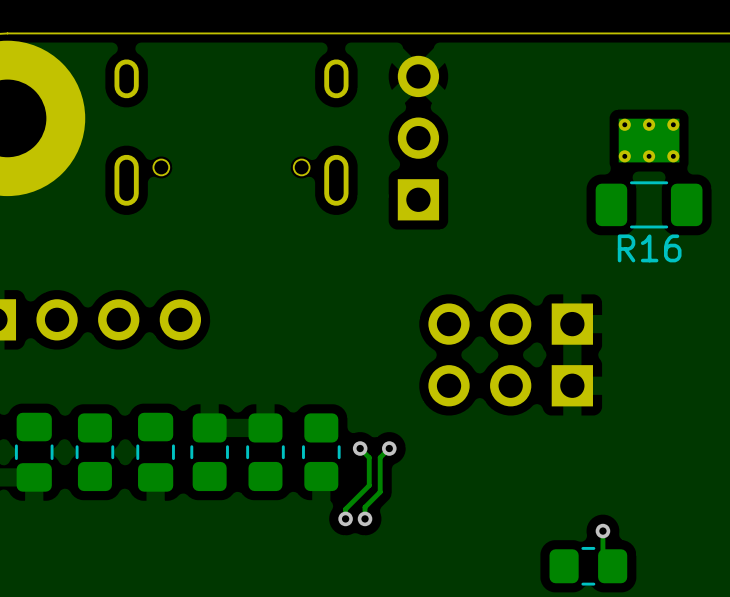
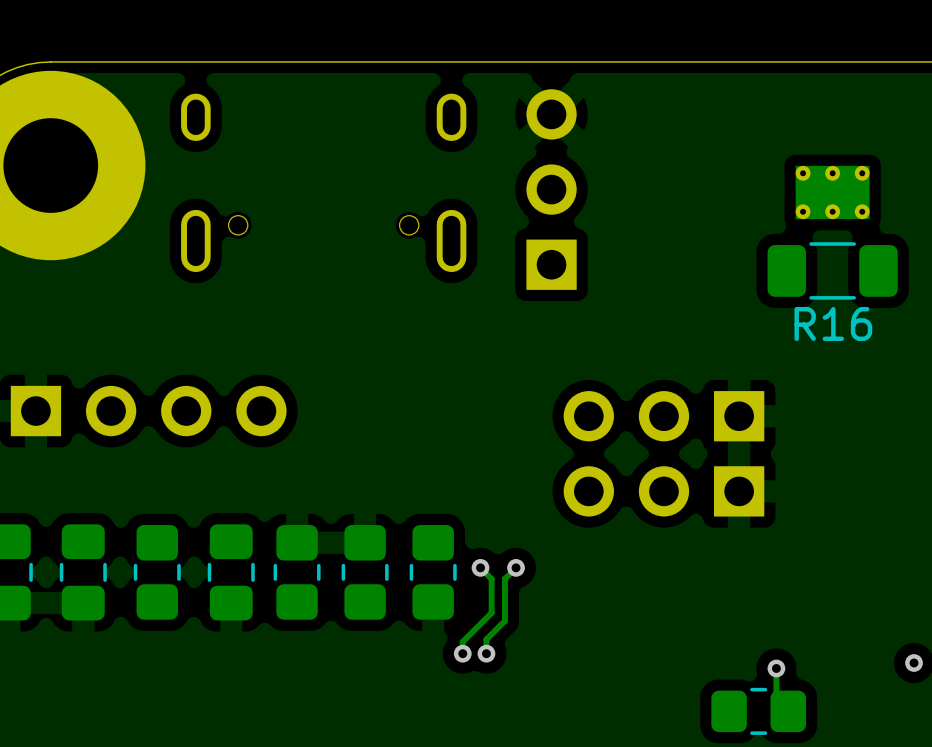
via: none -> (914, 663)

